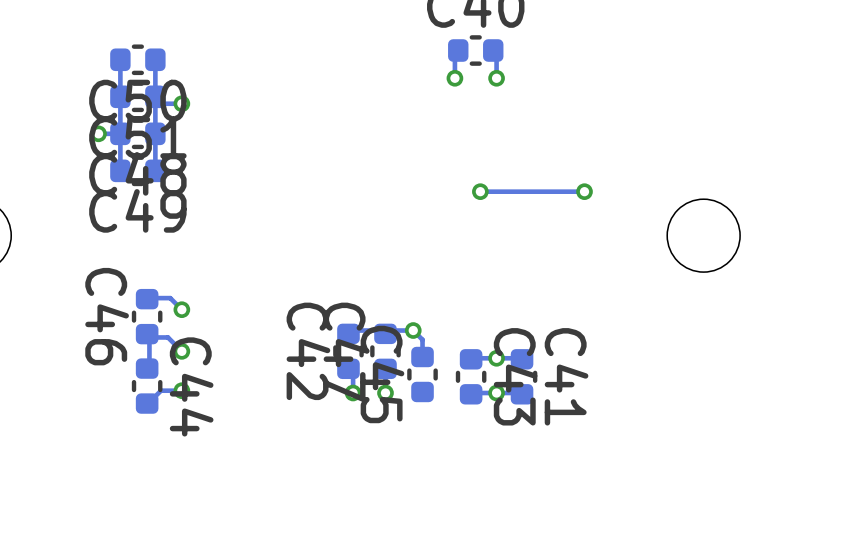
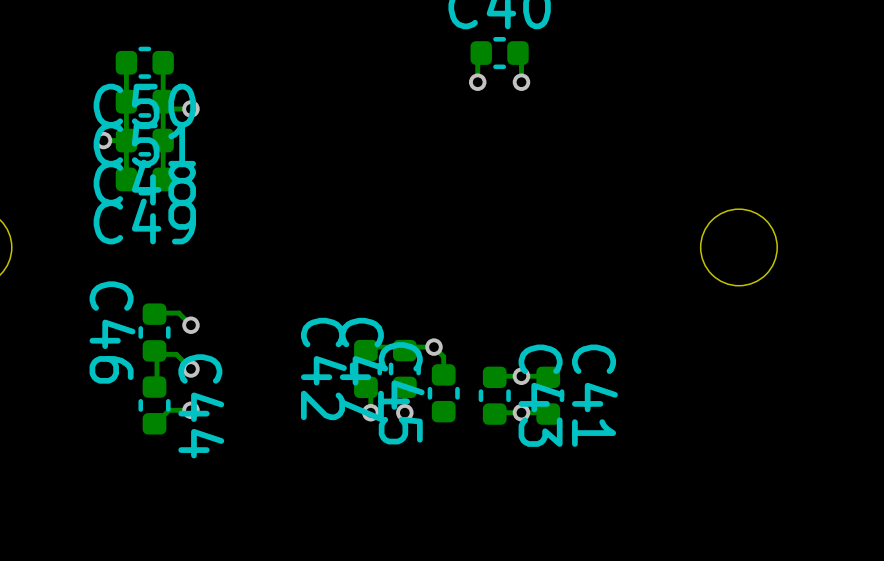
via: (480, 191) -> none
track: (584, 191) (480, 191) -> none
via: (584, 191) -> none

